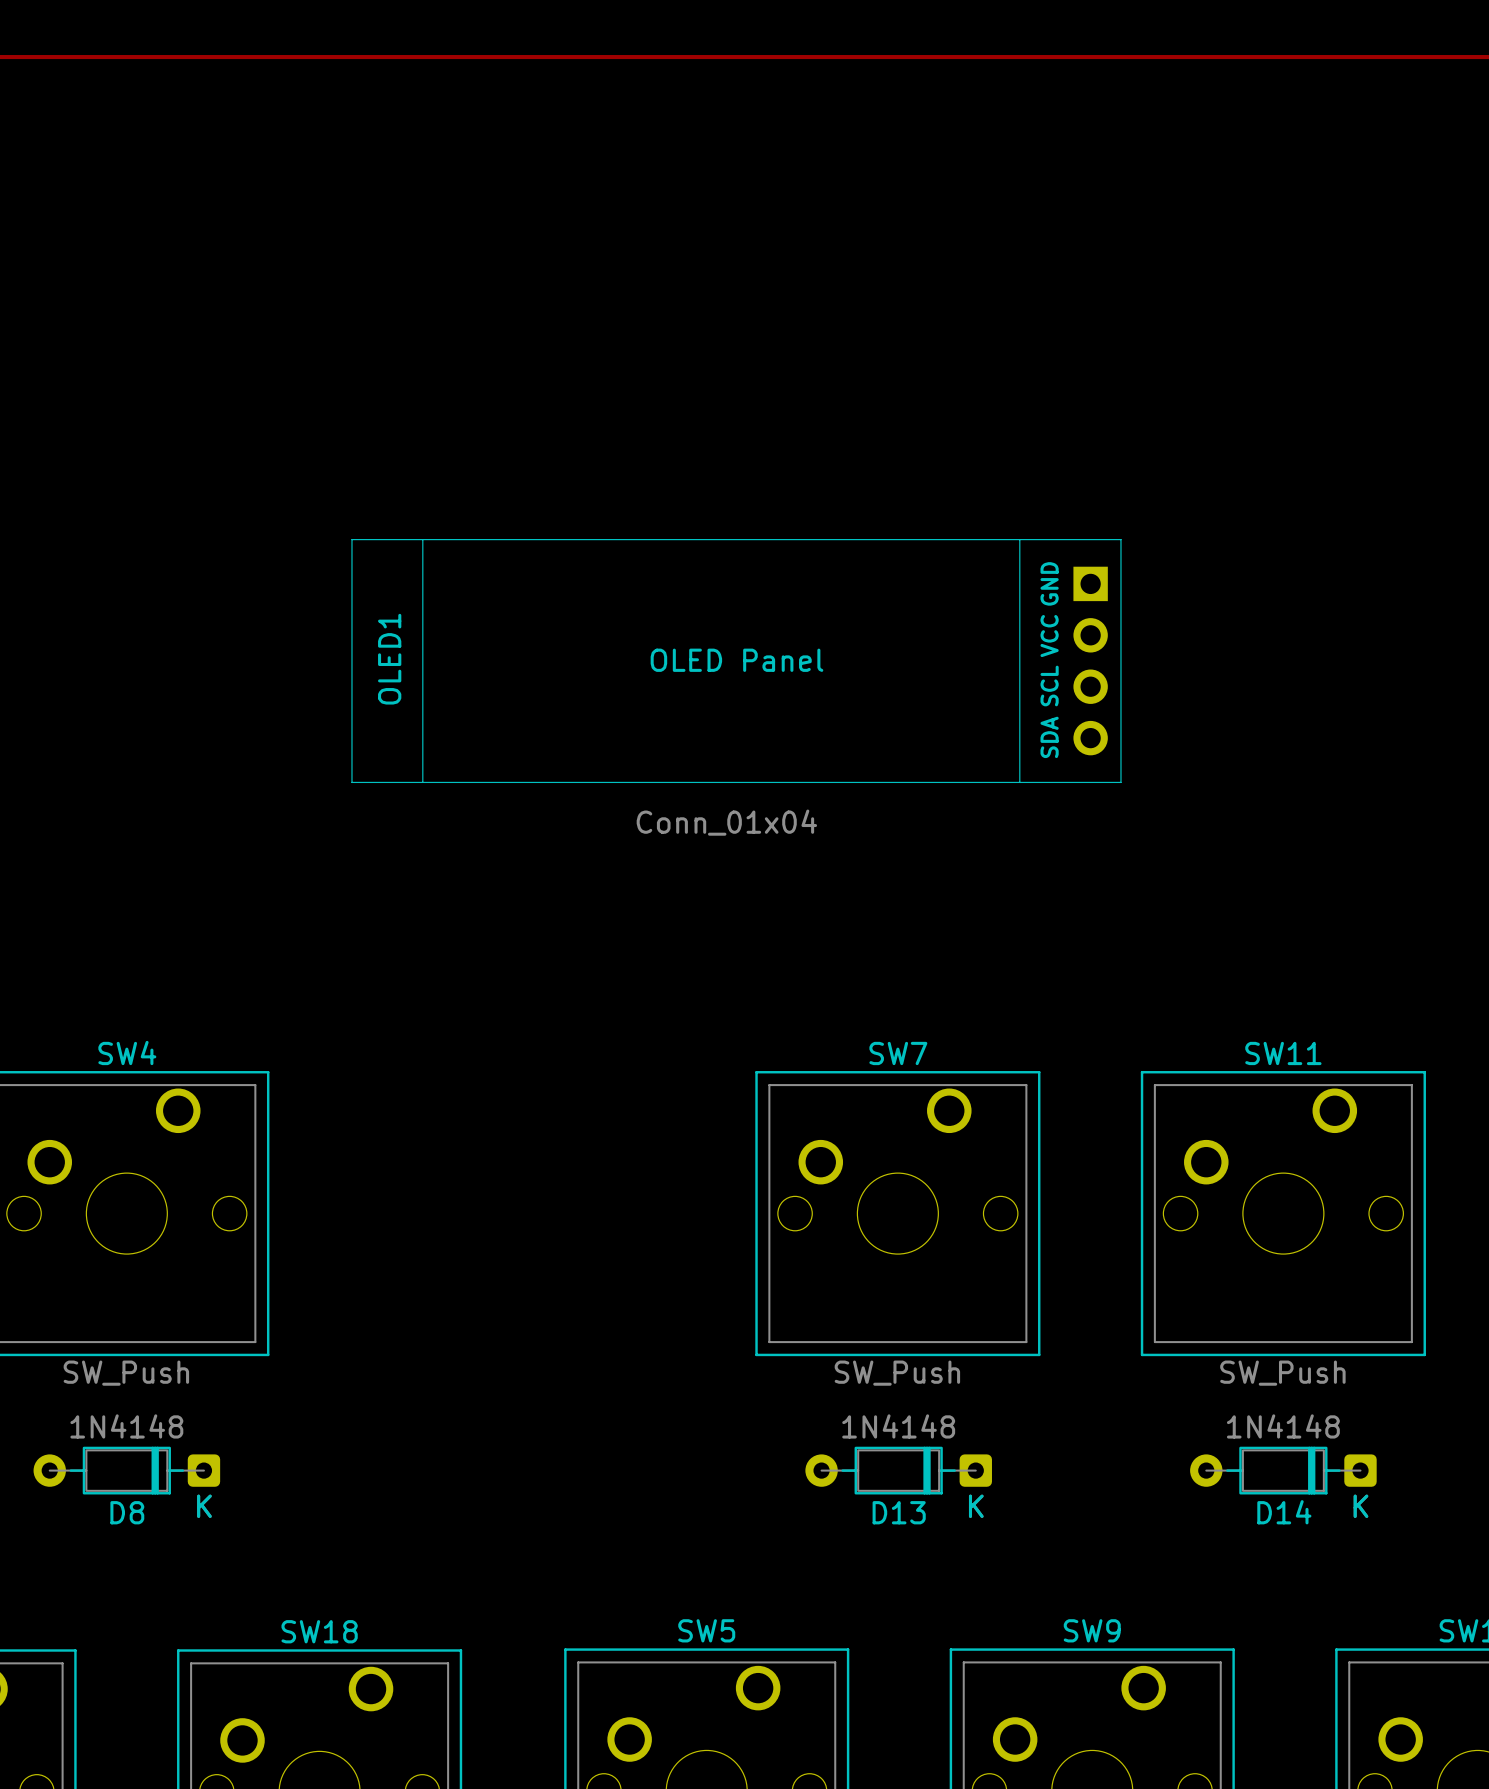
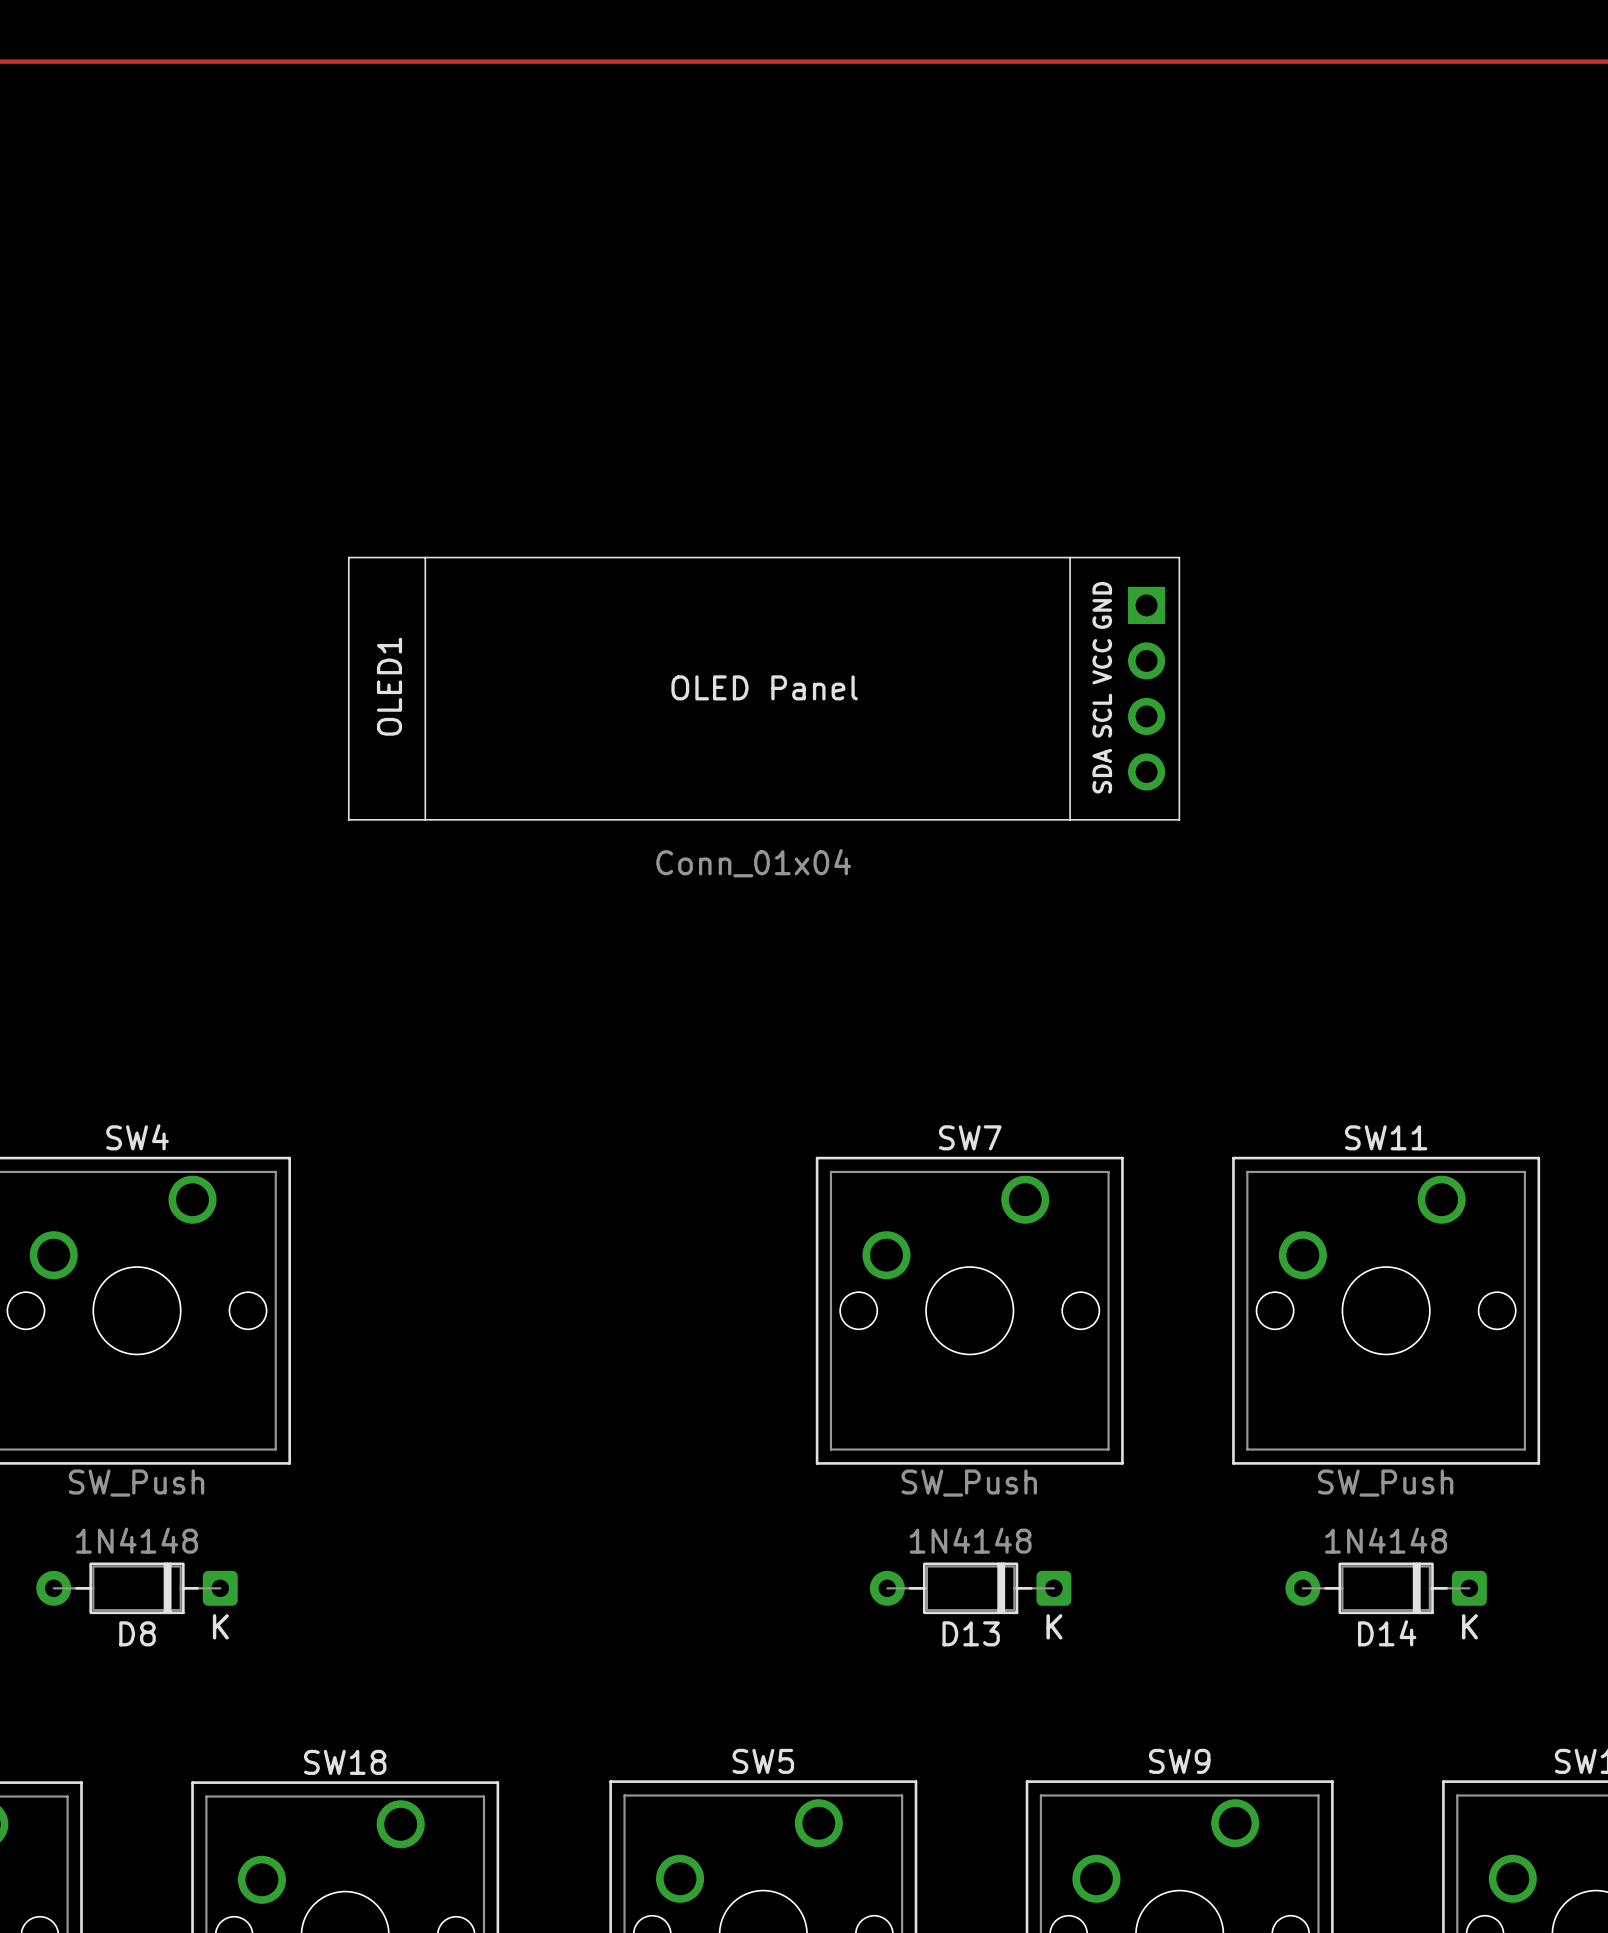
OLED1 position: (736, 661) -> (764, 688)

